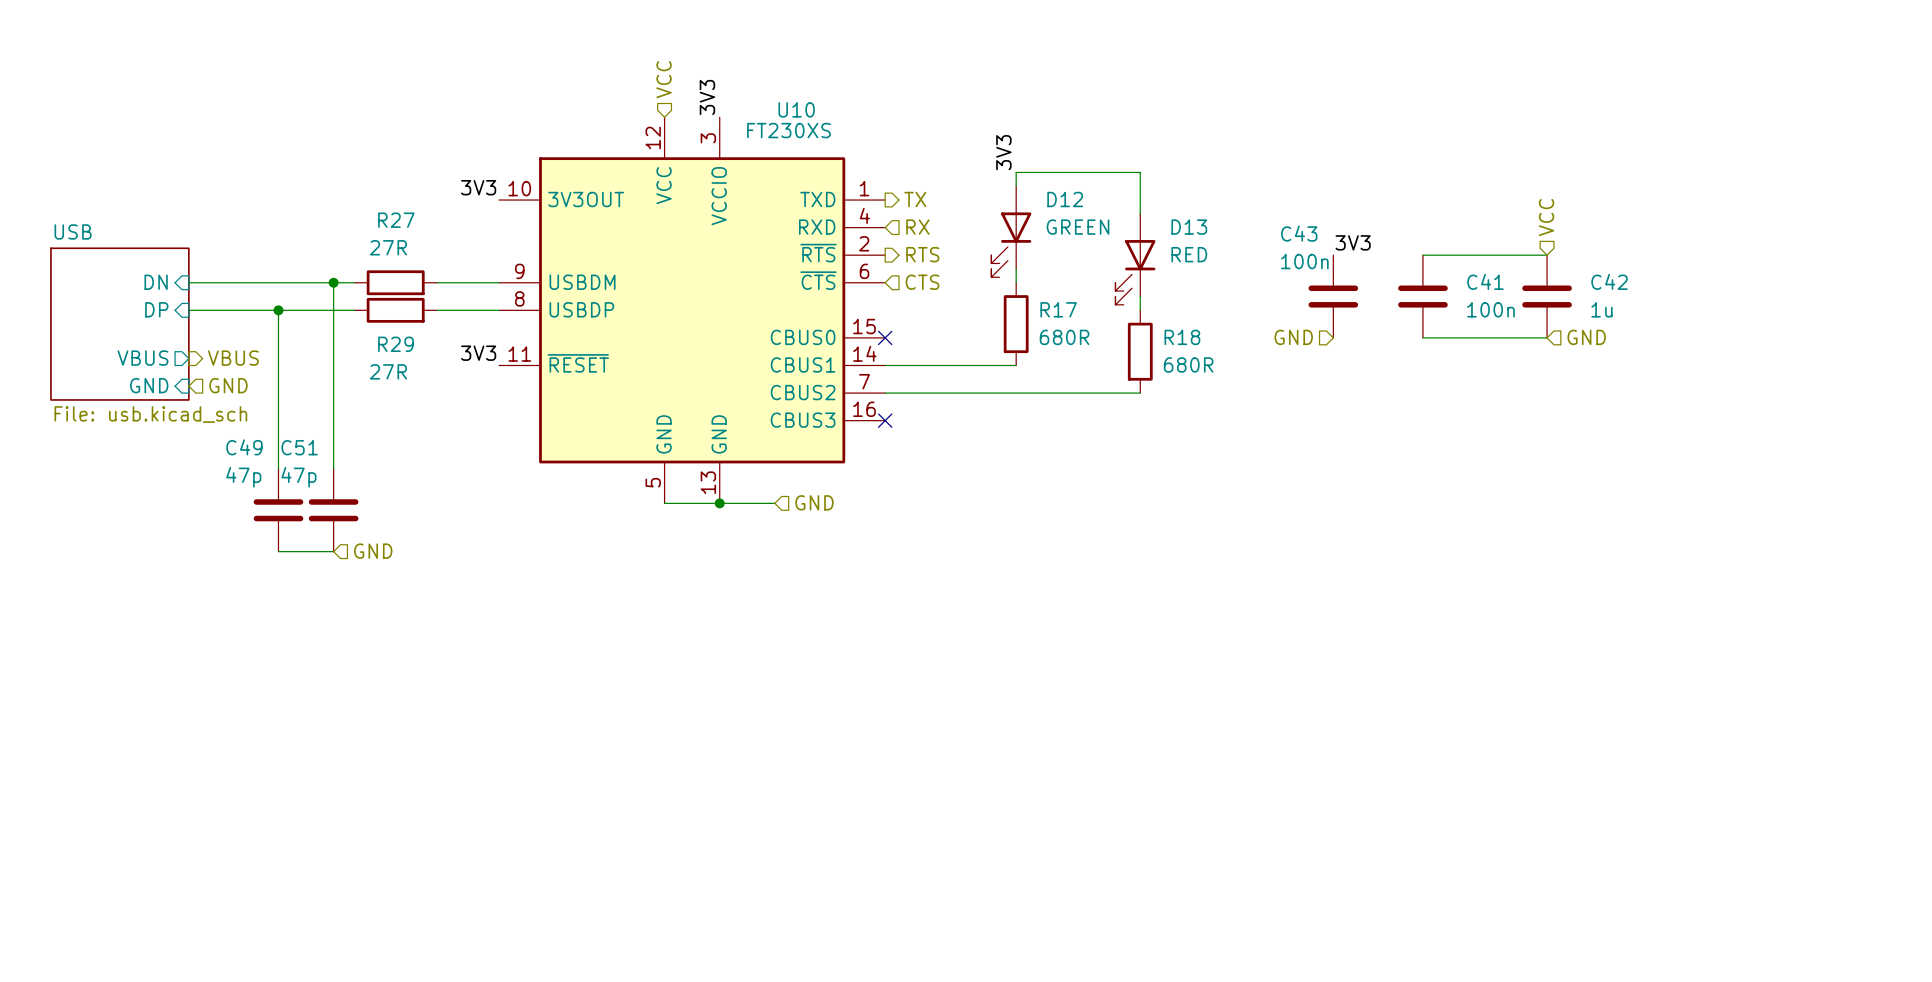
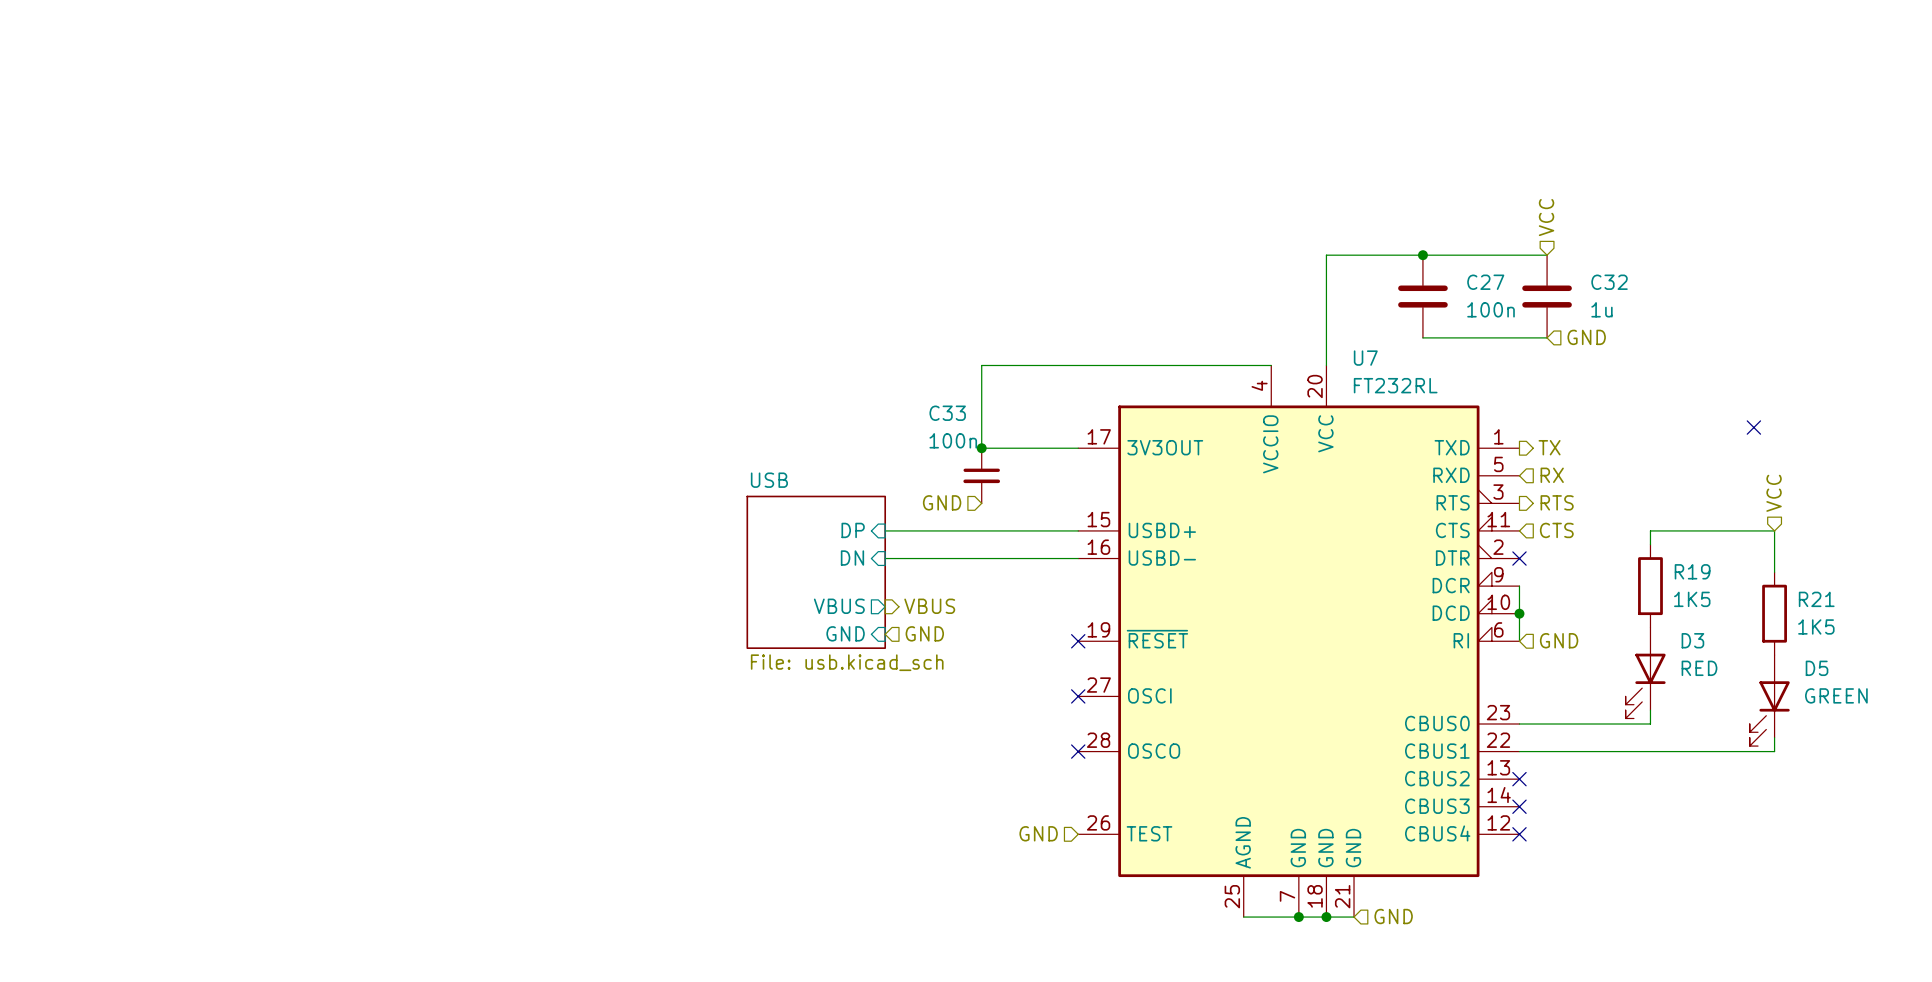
hierarchical label: VCC (664, 79) -> none
label: 3V3 (707, 97) -> none
label: 3V3 (1003, 152) -> none
wire: (1016, 186) (1016, 172) (1140, 172) (1140, 213) -> none
label: 3V3 (478, 187) -> none
hierarchical label: TX (915, 199) -> none
hierarchical label: RX (917, 227) -> none
D12: GREEN (1011, 231) -> none
label: 3V3 (1353, 242) -> none
hierarchical label: RTS (922, 254) -> none
wire: none -> (1422, 255) (1326, 255) (1326, 365)
junction: none -> (1422, 255)
D13: RED (1135, 259) -> none
wire: (1016, 268) (1016, 282) -> none
C41 name: C41 (1485, 281) -> C27 (1485, 282)
C42 name: C42 (1609, 281) -> C32 (1609, 282)
sheet pin: DN (156, 282) -> none
wire: (188, 282) (354, 282) -> none
wire: (333, 282) (333, 468) -> none
junction: (333, 282) -> none
R27: 27R (395, 282) -> none
wire: (437, 282) (499, 282) -> none
hierarchical label: CTS (922, 282) -> none
wire: (1140, 296) (1140, 310) -> none
C43: 100n (1333, 296) -> none
sheet pin: DP (156, 309) -> none
wire: (188, 310) (354, 310) -> none
wire: (278, 310) (278, 468) -> none
junction: (278, 310) -> none
R29: 27R (395, 310) -> none
wire: (437, 310) (499, 310) -> none
U10: FT230XS (692, 310) -> none
sheet USB: File: usb.kicad_sch (119, 324) -> none
R17: 680R (1016, 324) -> none
no-connect mark: (885, 337) -> none
hierarchical label: GND (1293, 337) -> none
R18: 680R (1140, 351) -> none
label: 3V3 (478, 353) -> none
sheet pin: VBUS (143, 358) -> none
hierarchical label: VBUS (233, 358) -> none
wire: (885, 365) (981, 365) -> (1078, 448) (981, 448) (981, 365)
sheet pin: GND (149, 385) -> none
hierarchical label: GND (228, 385) -> none
wire: (885, 393) (1140, 393) -> (1016, 365) (1271, 365)
no-connect mark: (885, 420) -> none
no-connect mark: none -> (1753, 427)
hierarchical label: none -> TX (1549, 447)
junction: none -> (981, 448)
C33: none -> 100n (981, 475)
hierarchical label: none -> RX (1552, 475)
hierarchical label: none -> VCC (1774, 493)
hierarchical label: GND (814, 502) -> none
hierarchical label: none -> GND (942, 502)
hierarchical label: none -> RTS (1557, 502)
wire: (664, 503) (774, 503) -> none
junction: (719, 503) -> none
C49: 47p (278, 510) -> none
C51: 47p (333, 510) -> none
sheet pin: none -> DP (853, 530)
wire: none -> (885, 530) (1078, 530)
hierarchical label: none -> CTS (1556, 530)
wire: none -> (1650, 544) (1650, 530) (1774, 530) (1774, 572)
wire: (278, 551) (333, 551) -> none
hierarchical label: GND (373, 551) -> none
sheet pin: none -> DN (852, 558)
wire: none -> (885, 558) (1078, 558)
no-connect mark: none -> (1519, 558)
sheet USB: none -> File: usb.kicad_sch (816, 572)
wire: none -> (1519, 586) (1519, 641)
R19: none -> 1K5 (1650, 586)
sheet pin: none -> VBUS (839, 606)
hierarchical label: none -> VBUS (929, 606)
junction: none -> (1519, 613)
R21: none -> 1K5 (1774, 613)
sheet pin: none -> GND (845, 633)
hierarchical label: none -> GND (924, 633)
hierarchical label: none -> GND (1559, 640)
no-connect mark: none -> (1078, 641)
U7: none -> FT232RL (1298, 641)
D3: none -> RED (1645, 672)
no-connect mark: none -> (1078, 696)
D5: none -> GREEN (1769, 700)
wire: none -> (1650, 710) (1650, 724) (1519, 724)
wire: none -> (1774, 737) (1774, 751) (1519, 751)
no-connect mark: none -> (1078, 751)
no-connect mark: none -> (1519, 779)
no-connect mark: none -> (1519, 806)
hierarchical label: none -> GND (1038, 833)
no-connect mark: none -> (1519, 834)
hierarchical label: none -> GND (1393, 916)
wire: none -> (1243, 917) (1354, 917)
junction: none -> (1298, 917)
junction: none -> (1326, 917)

